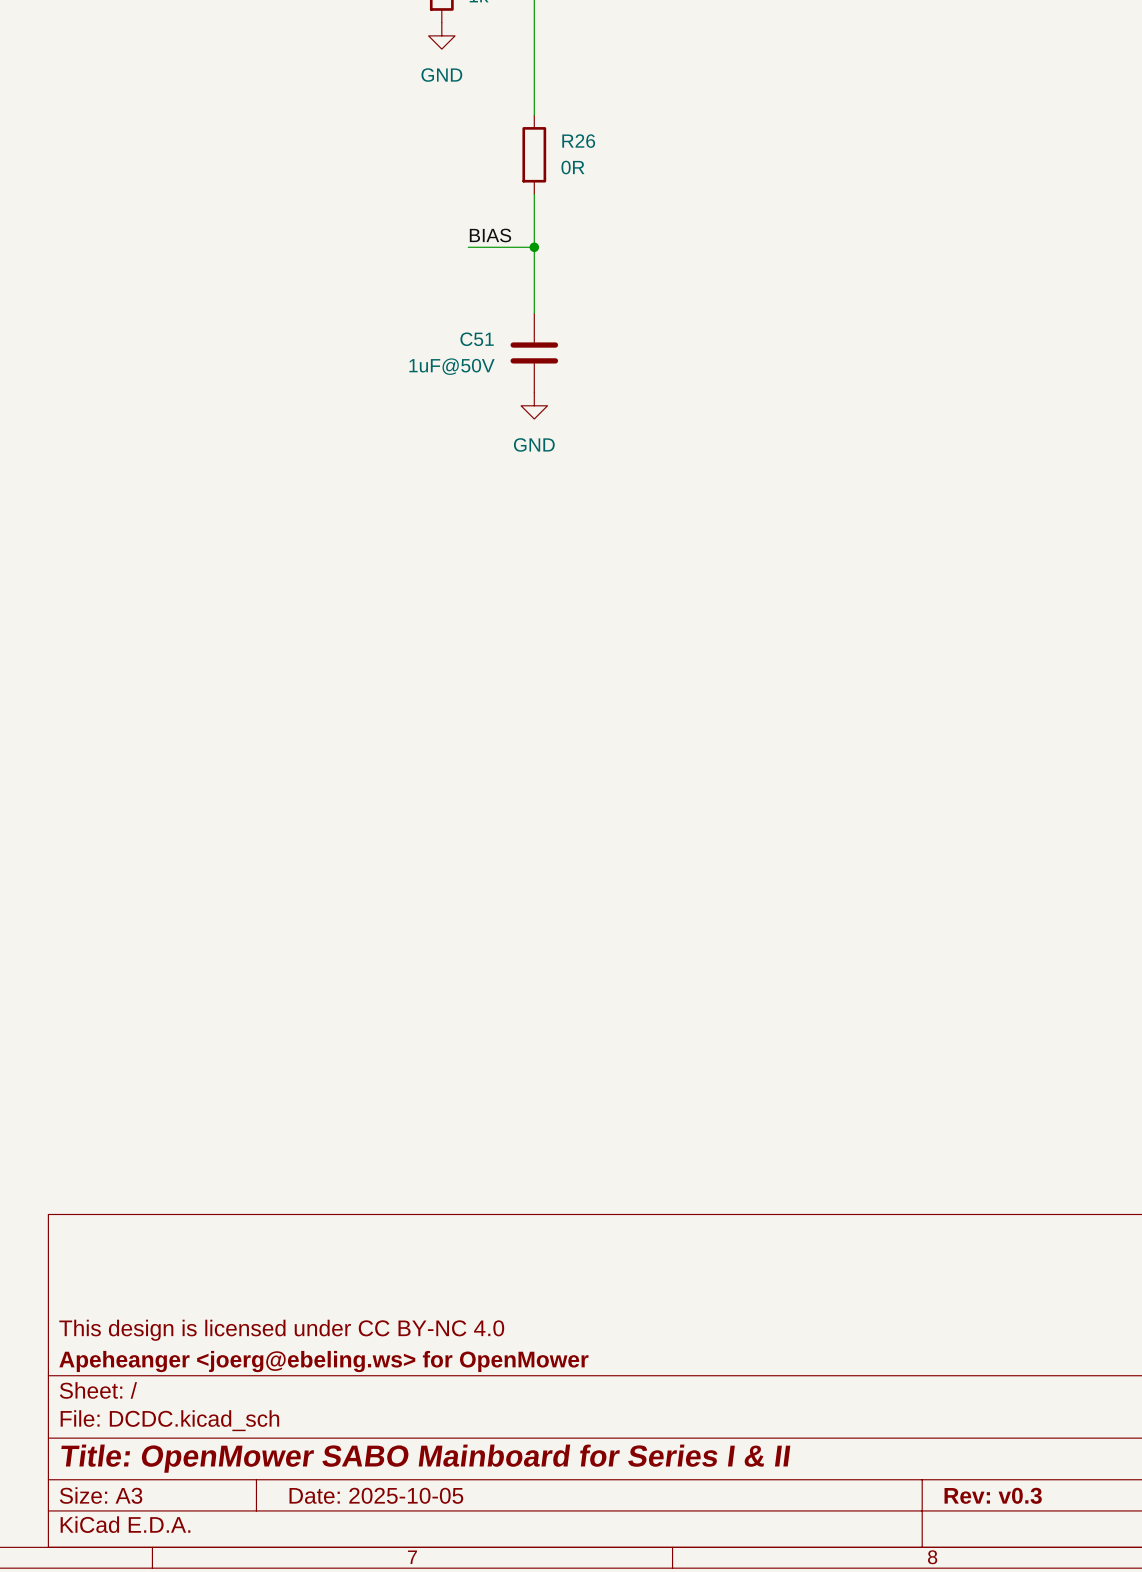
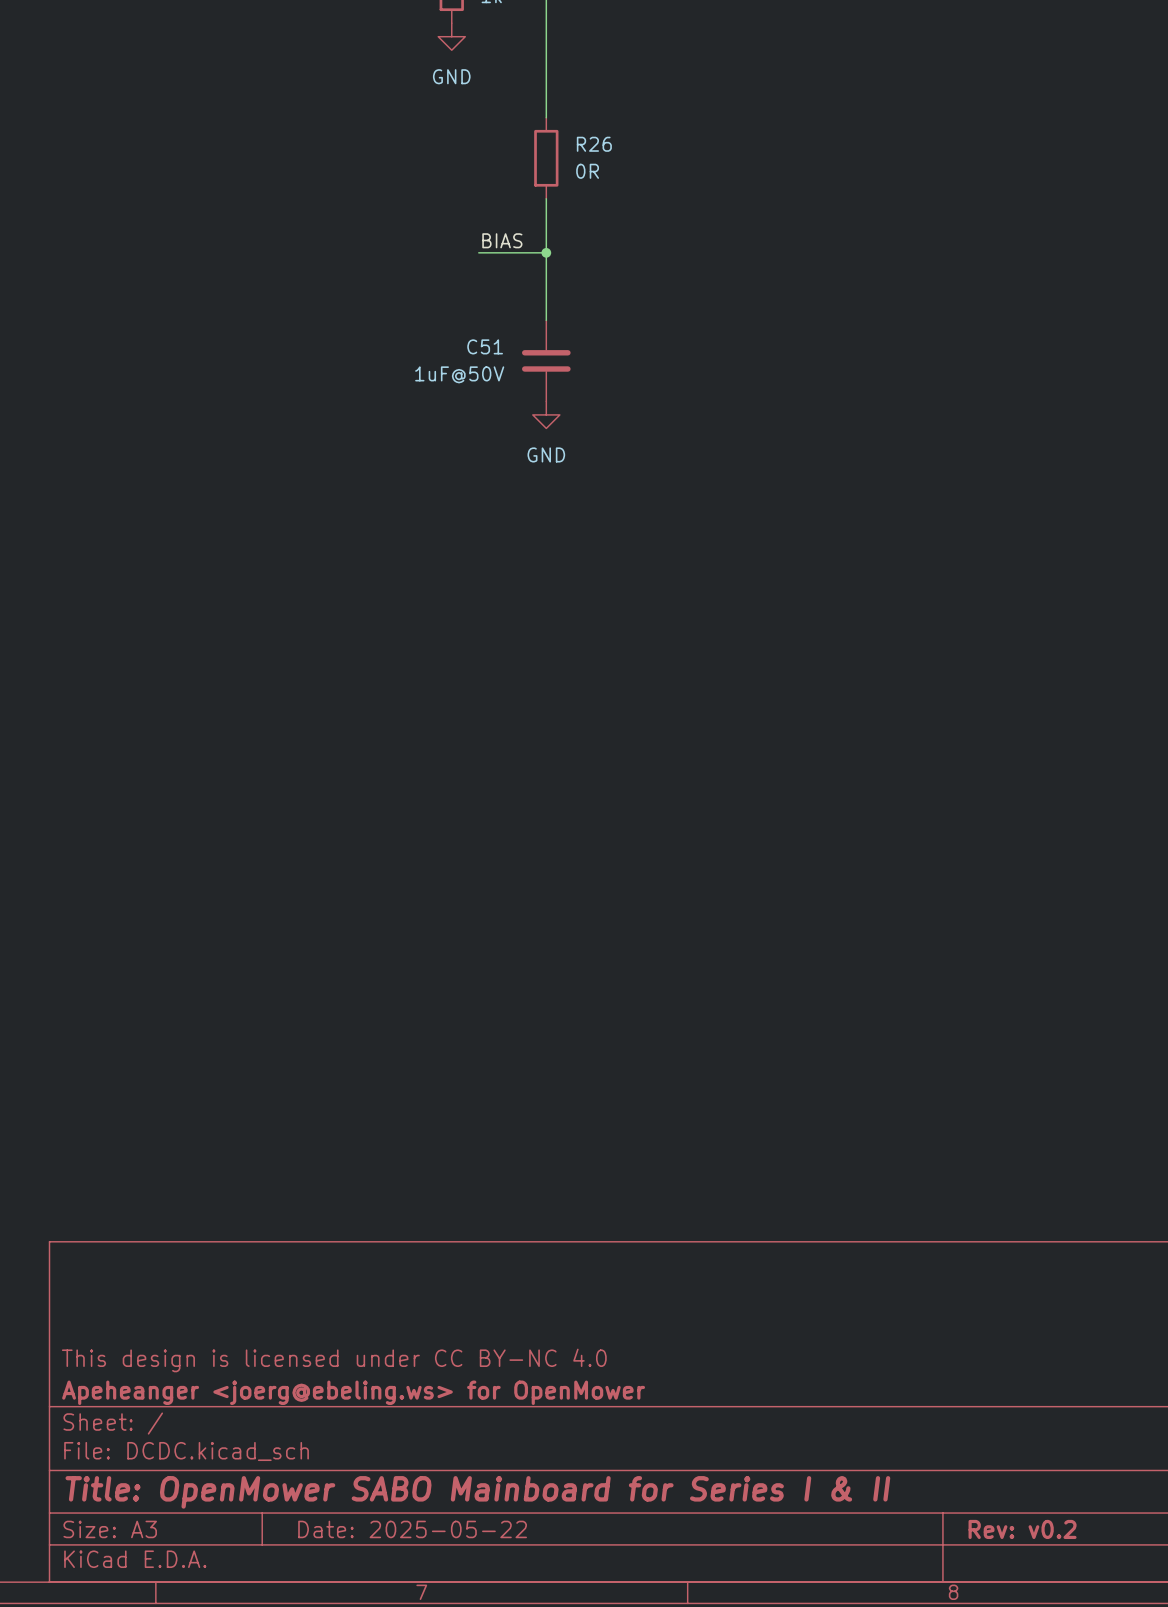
title block: Date: 2025-10-05 (376, 1495) -> Date: 2025-05-22 (412, 1529)
title block: Rev: v0.3 (993, 1495) -> Rev: v0.2 (1022, 1529)

